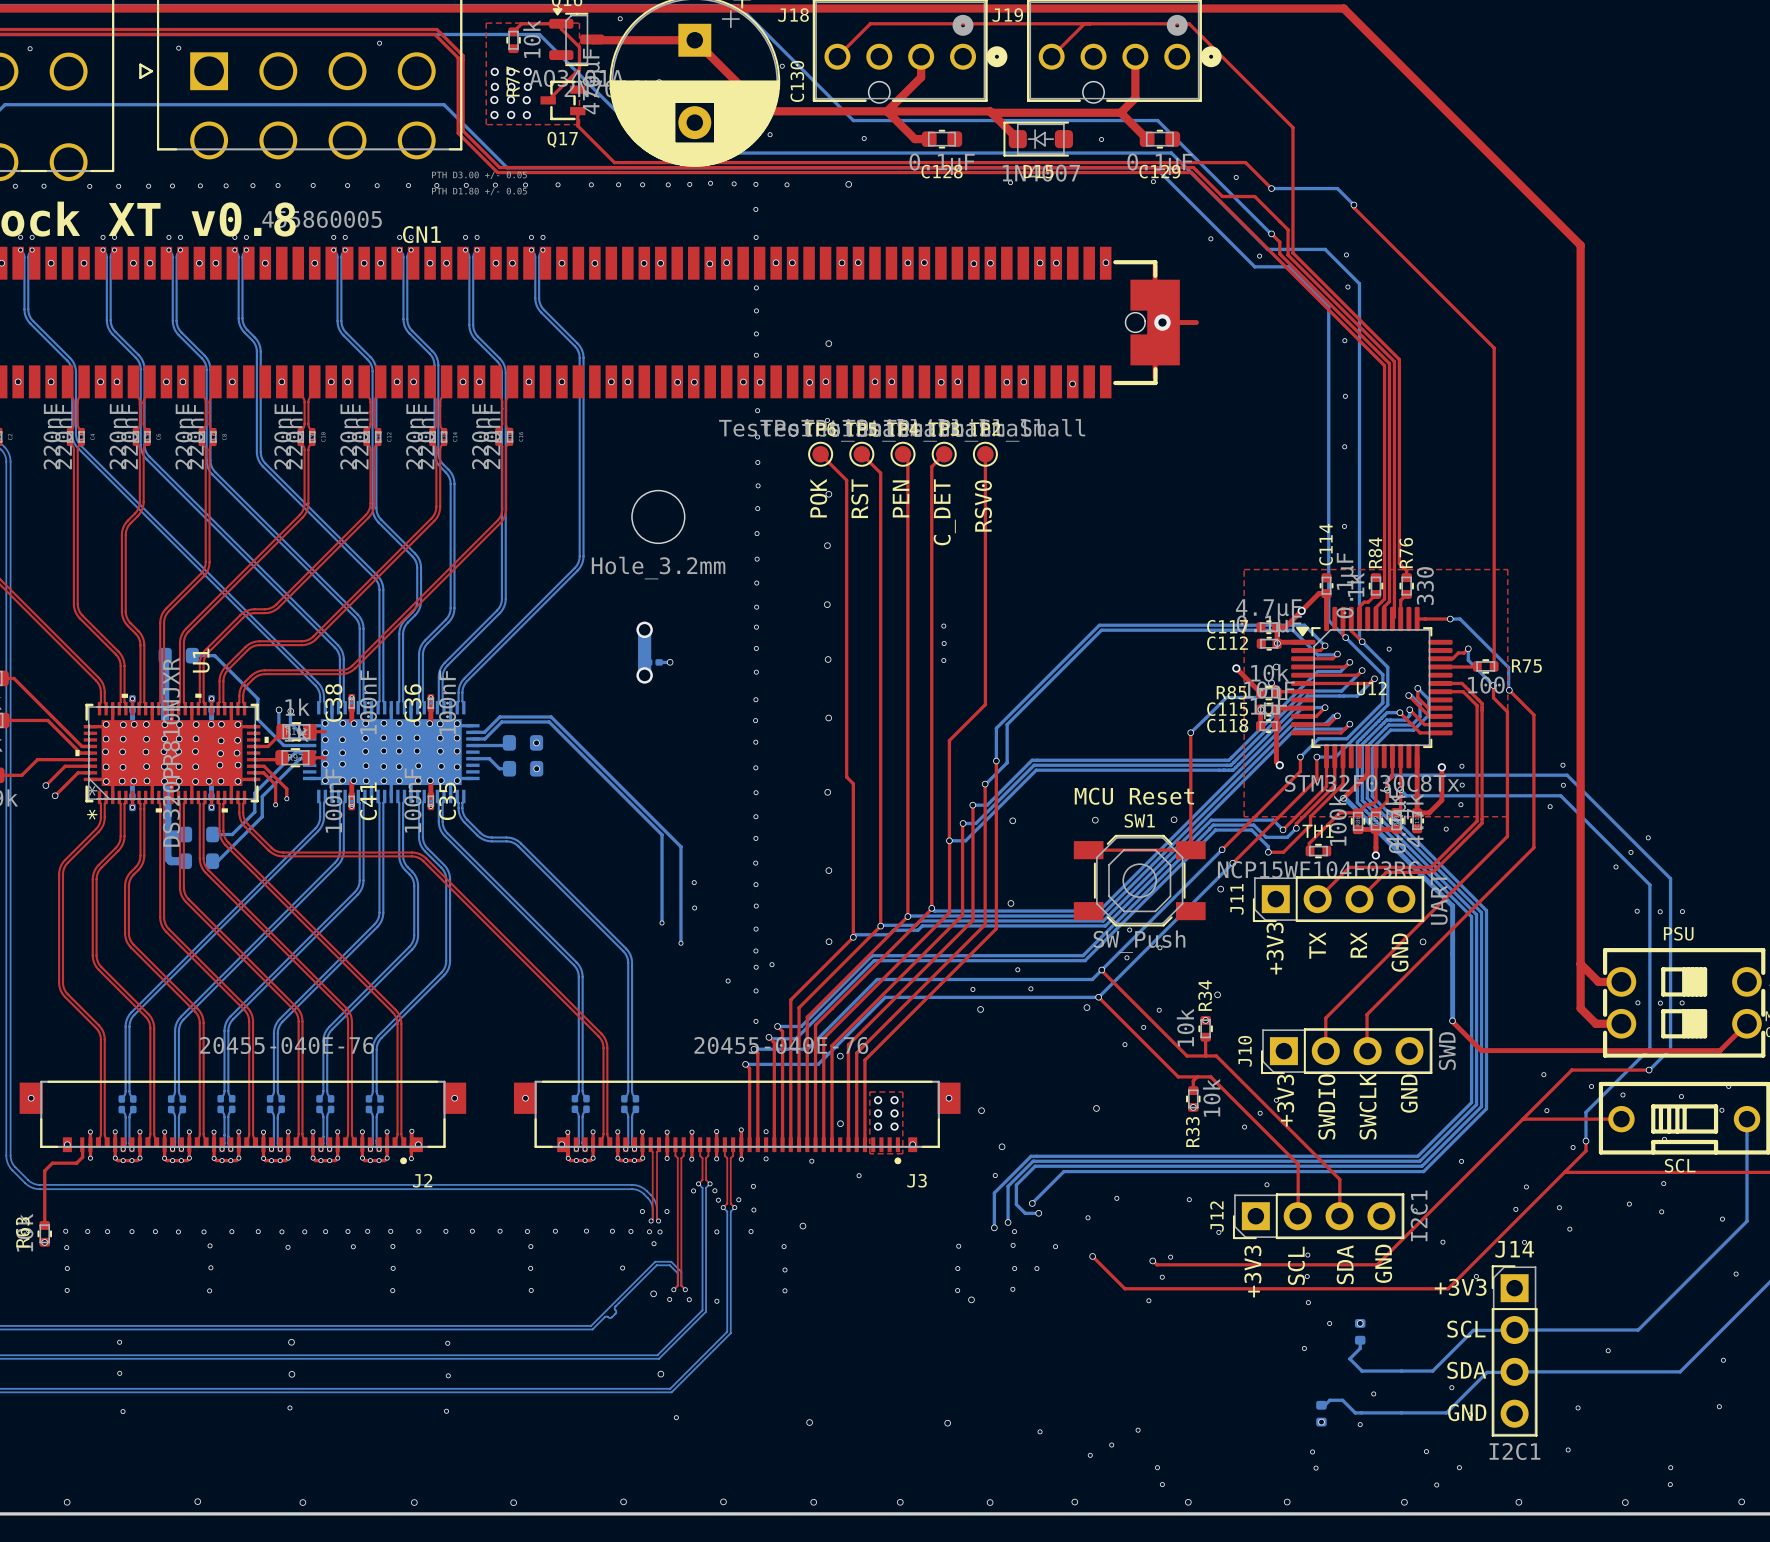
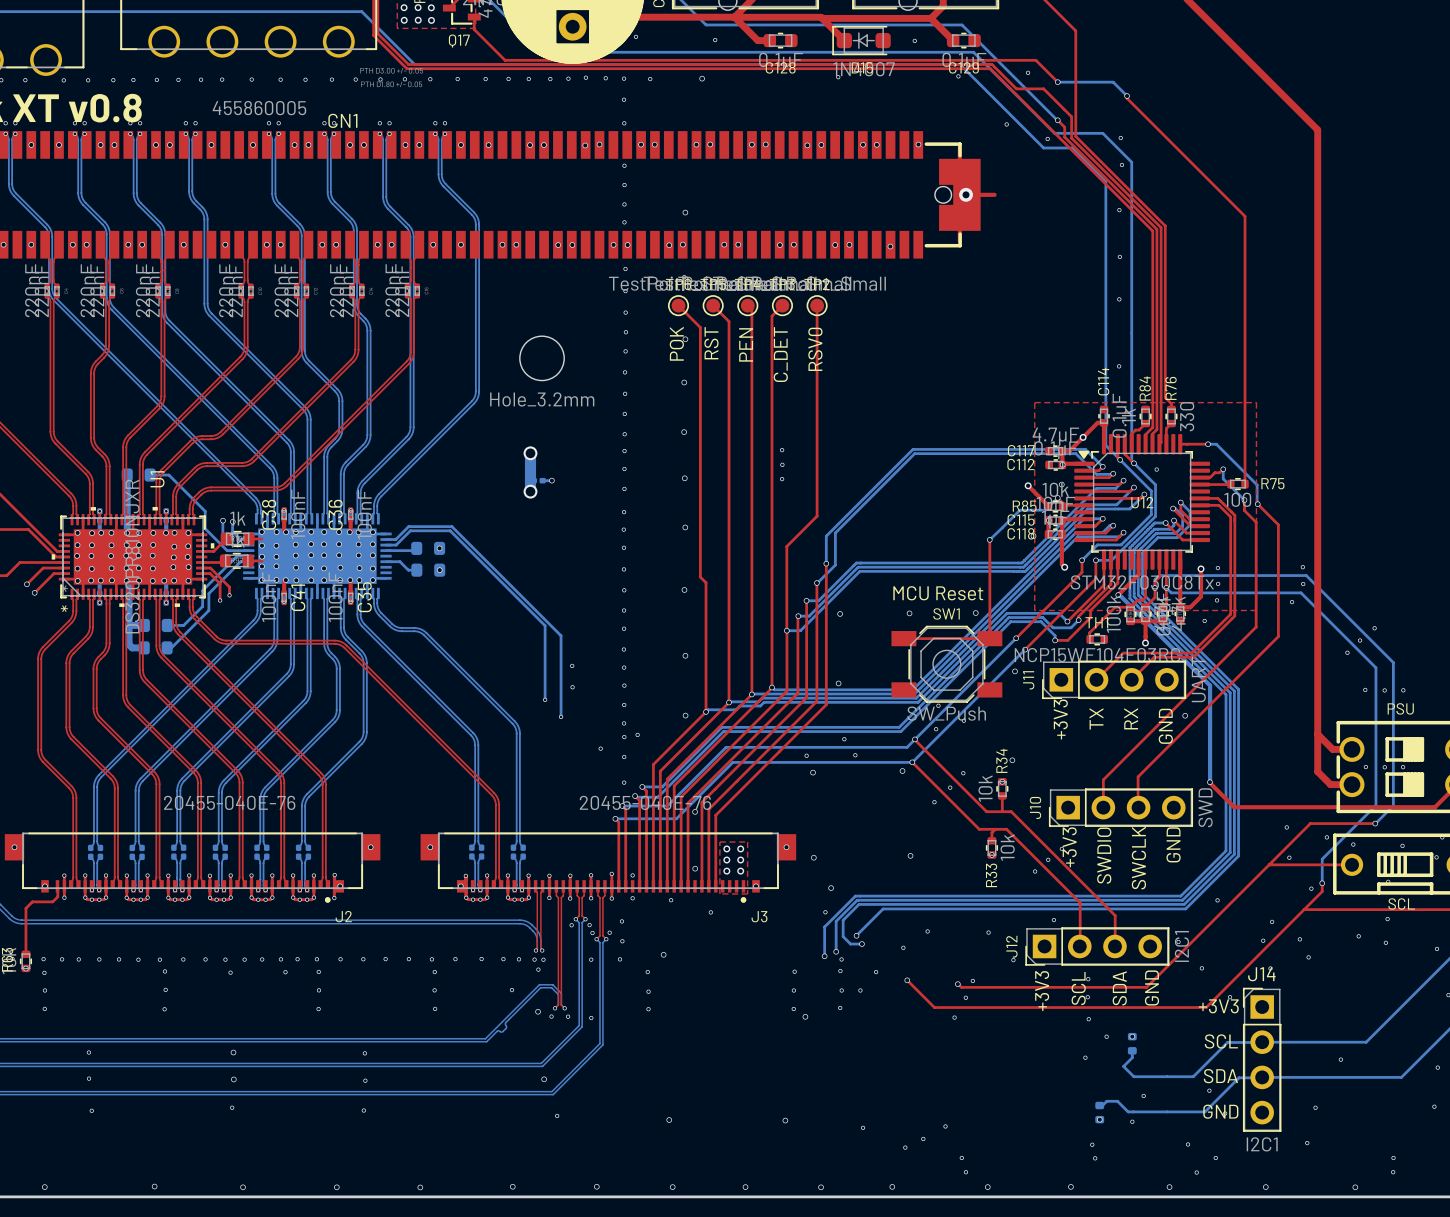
via: (642, 1211) -> none
via: (666, 1211) -> none

